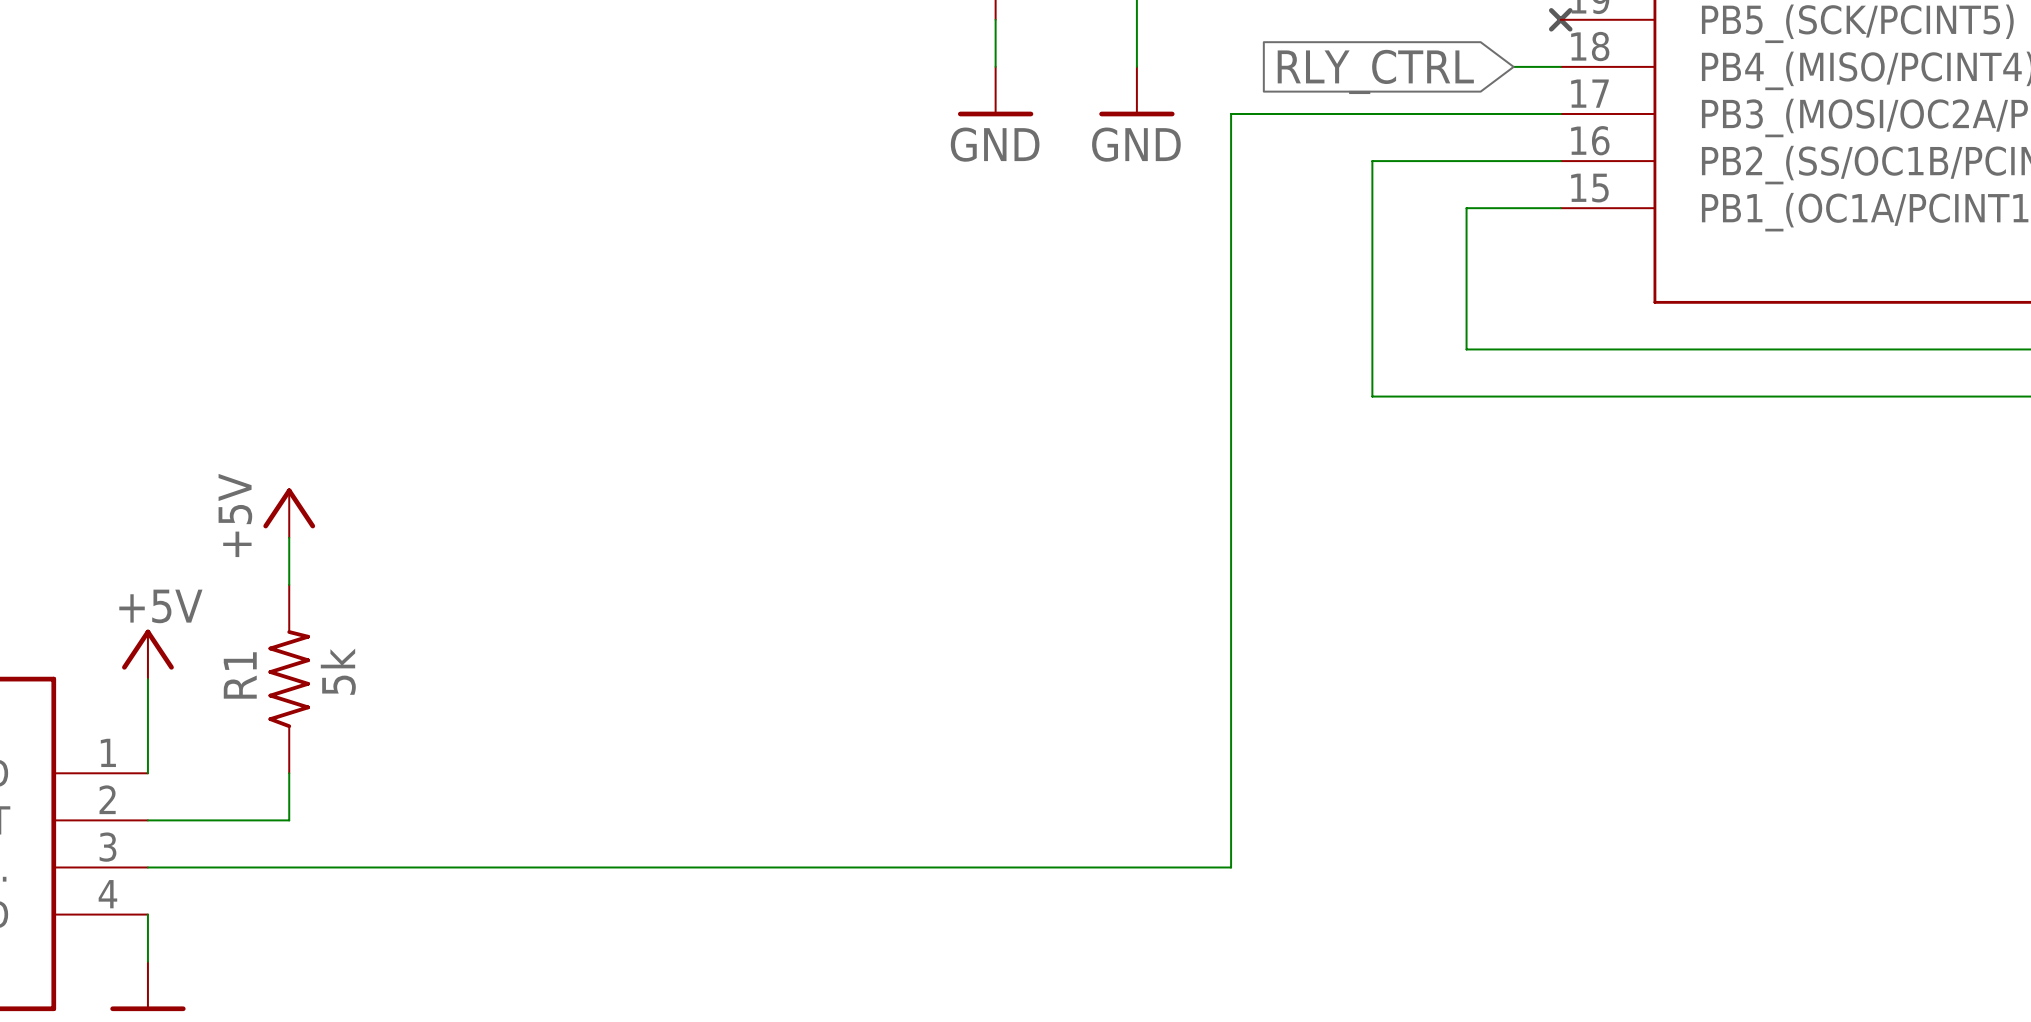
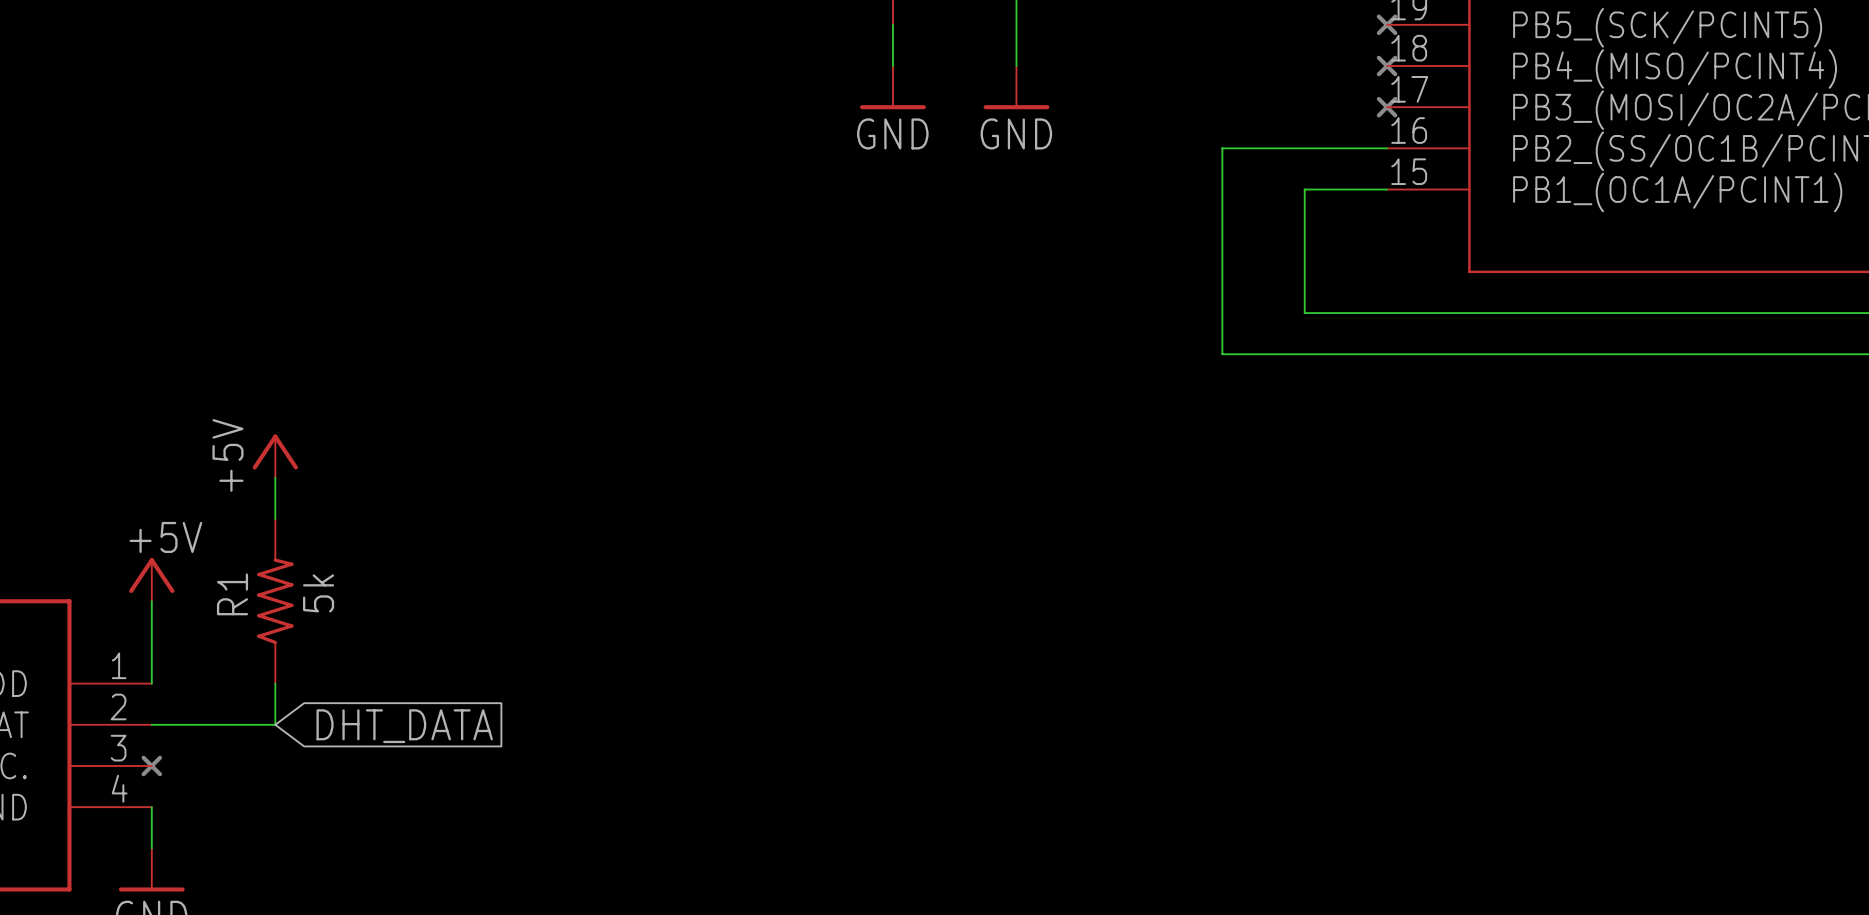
wire: (1513, 66) (1560, 66) -> none
part: none -> (1387, 65)
global label: RLY_CTRL (1375, 71) -> none
wire: (1560, 113) (1231, 113) (1231, 867) (147, 867) -> none
part: none -> (1387, 107)
global label: none -> DHT_DATA (404, 726)
part: none -> (151, 765)

